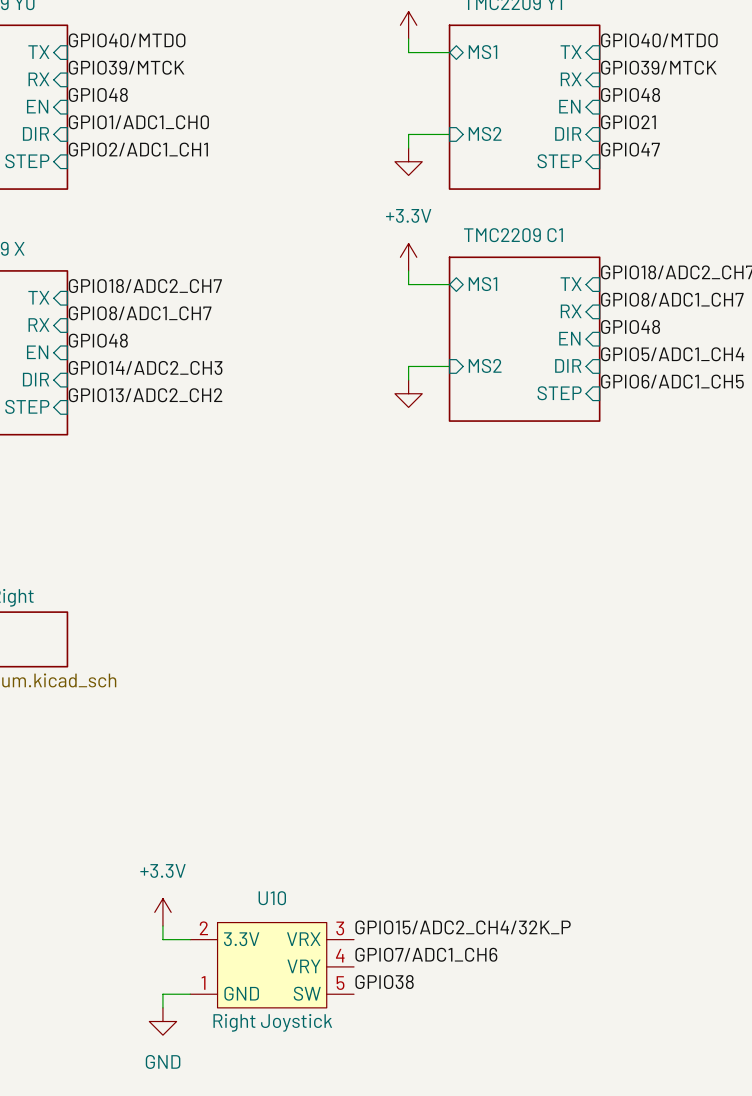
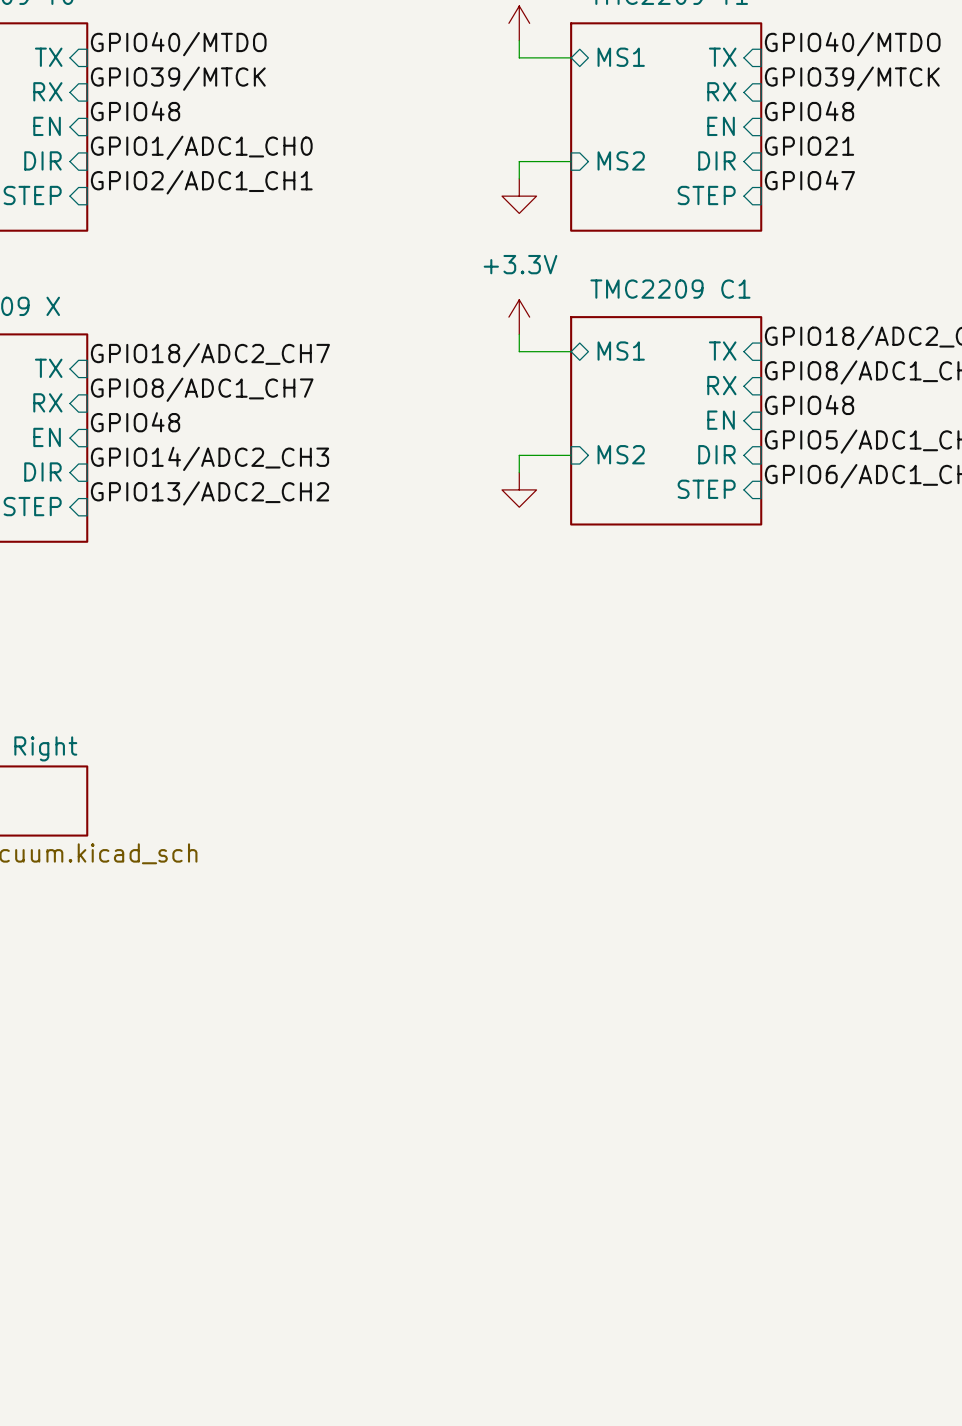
power symbol: +3.3V (162, 912) -> none
wire: (162, 925) (162, 939) (190, 939) -> none
label: GPIO15/ADC2_CH4/32K_P (463, 927) -> none
label: GPIO7/ADC1_CH6 (426, 954) -> none
U10: Right Joystick (272, 965) -> none
label: GPIO38 (384, 982) -> none
wire: (190, 994) (162, 994) (162, 1007) -> none
power symbol: GND (162, 1021) -> none

